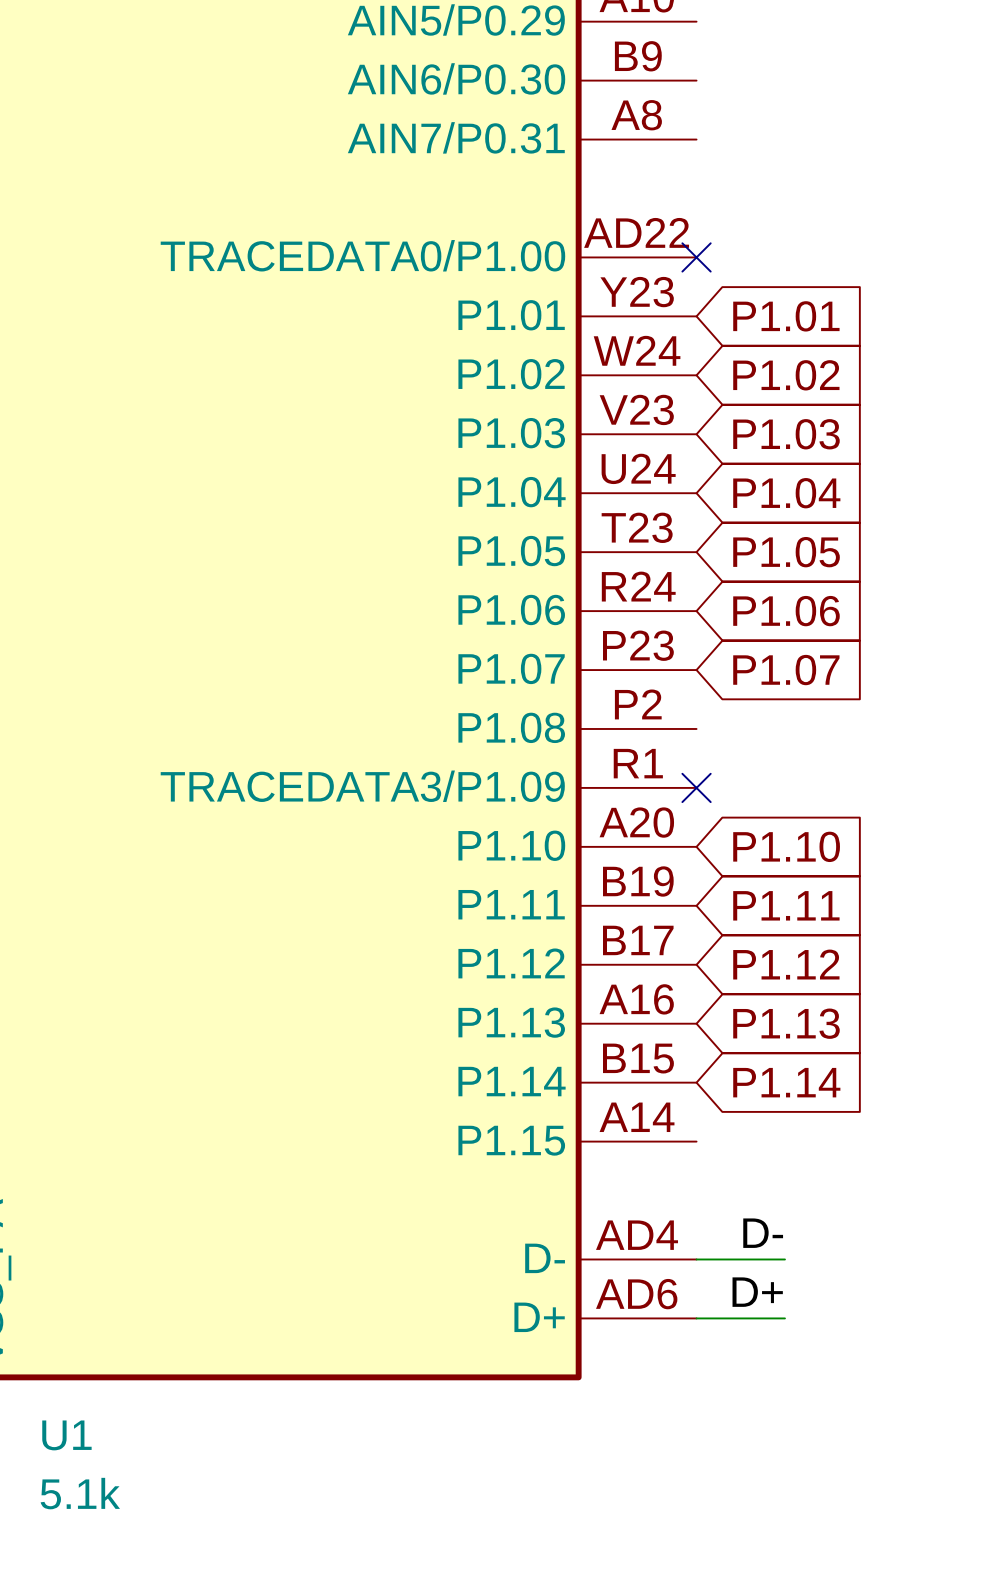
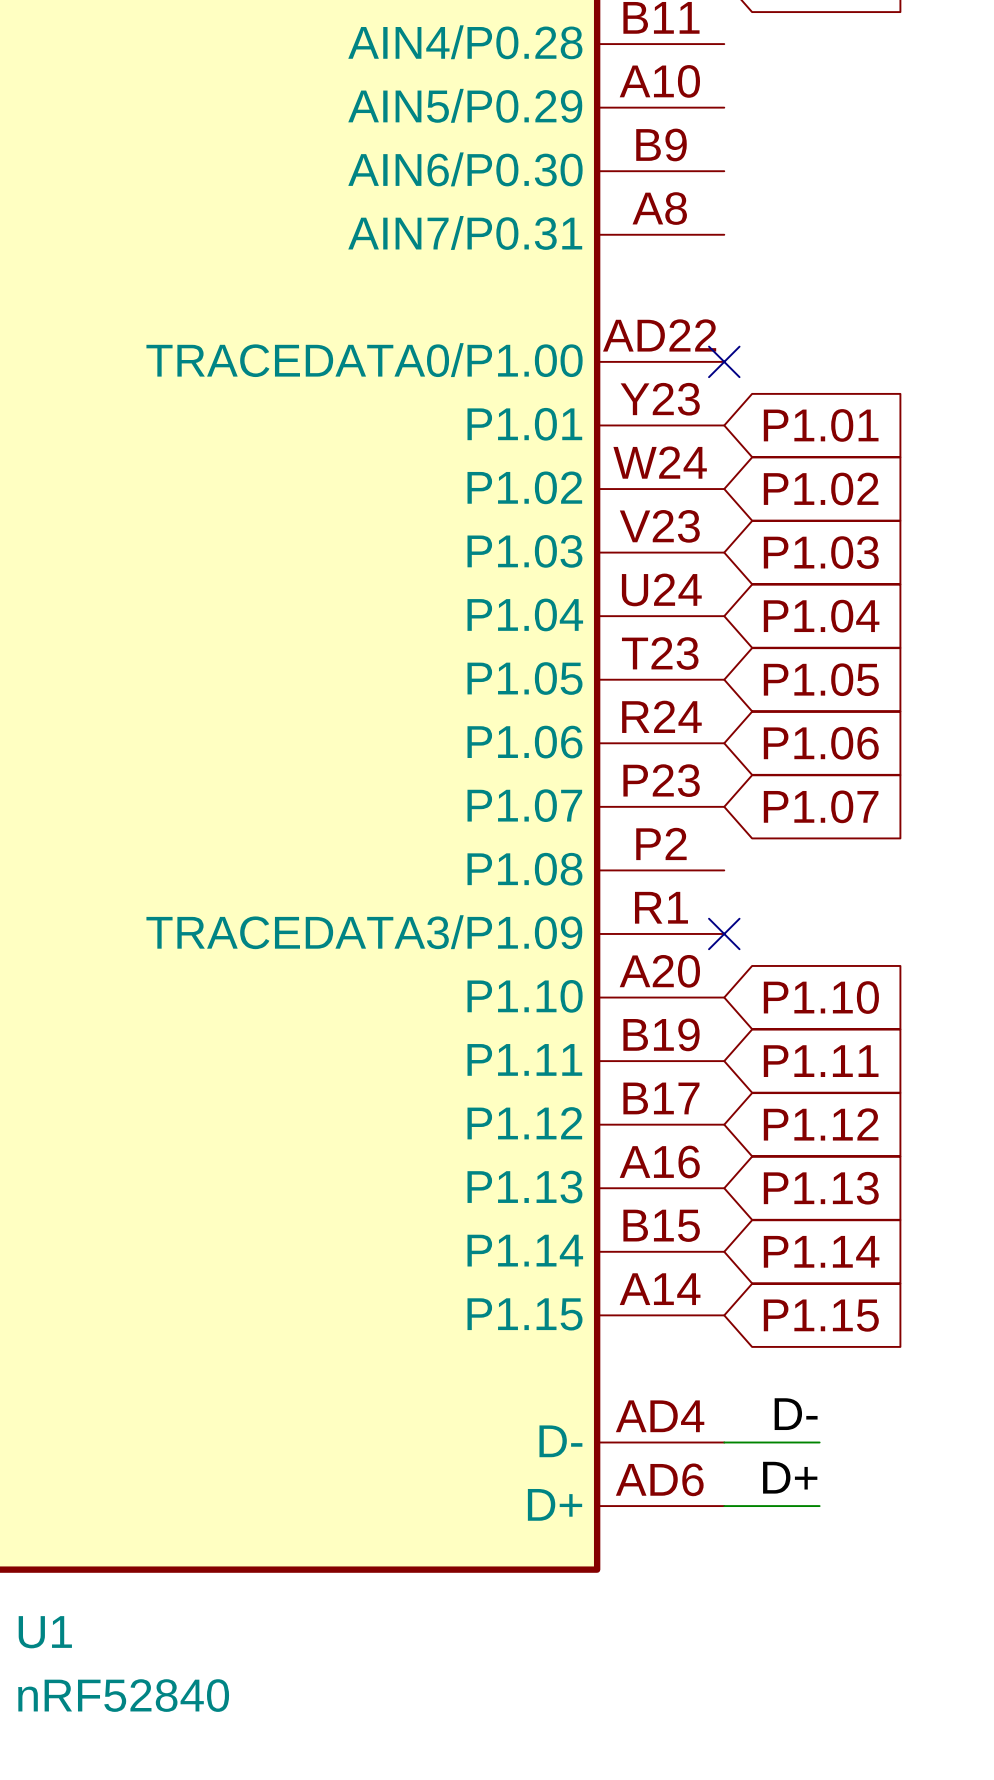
global label: none -> P1.15 (821, 1315)
U1 value: 5.1k (80, 1493) -> nRF52840 (123, 1695)

